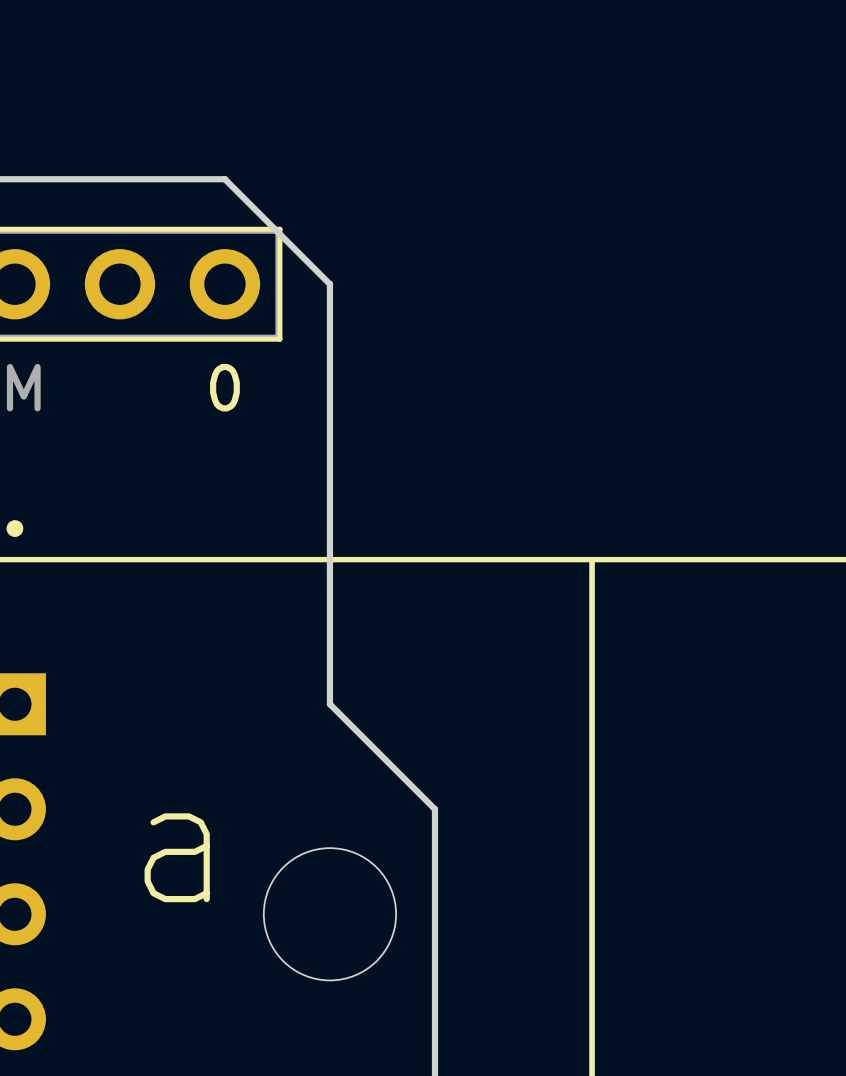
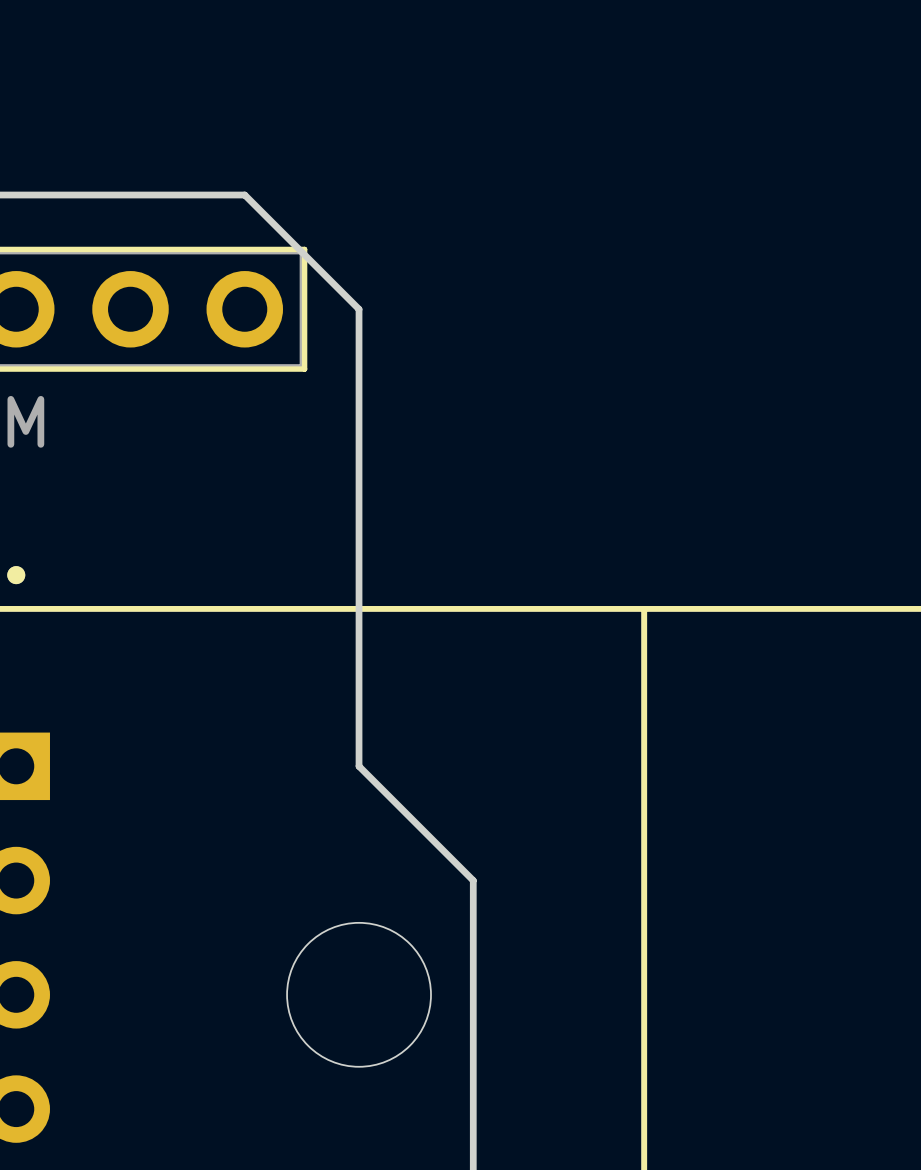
text: 0 (224, 387) -> none
text: a (177, 857) -> none

